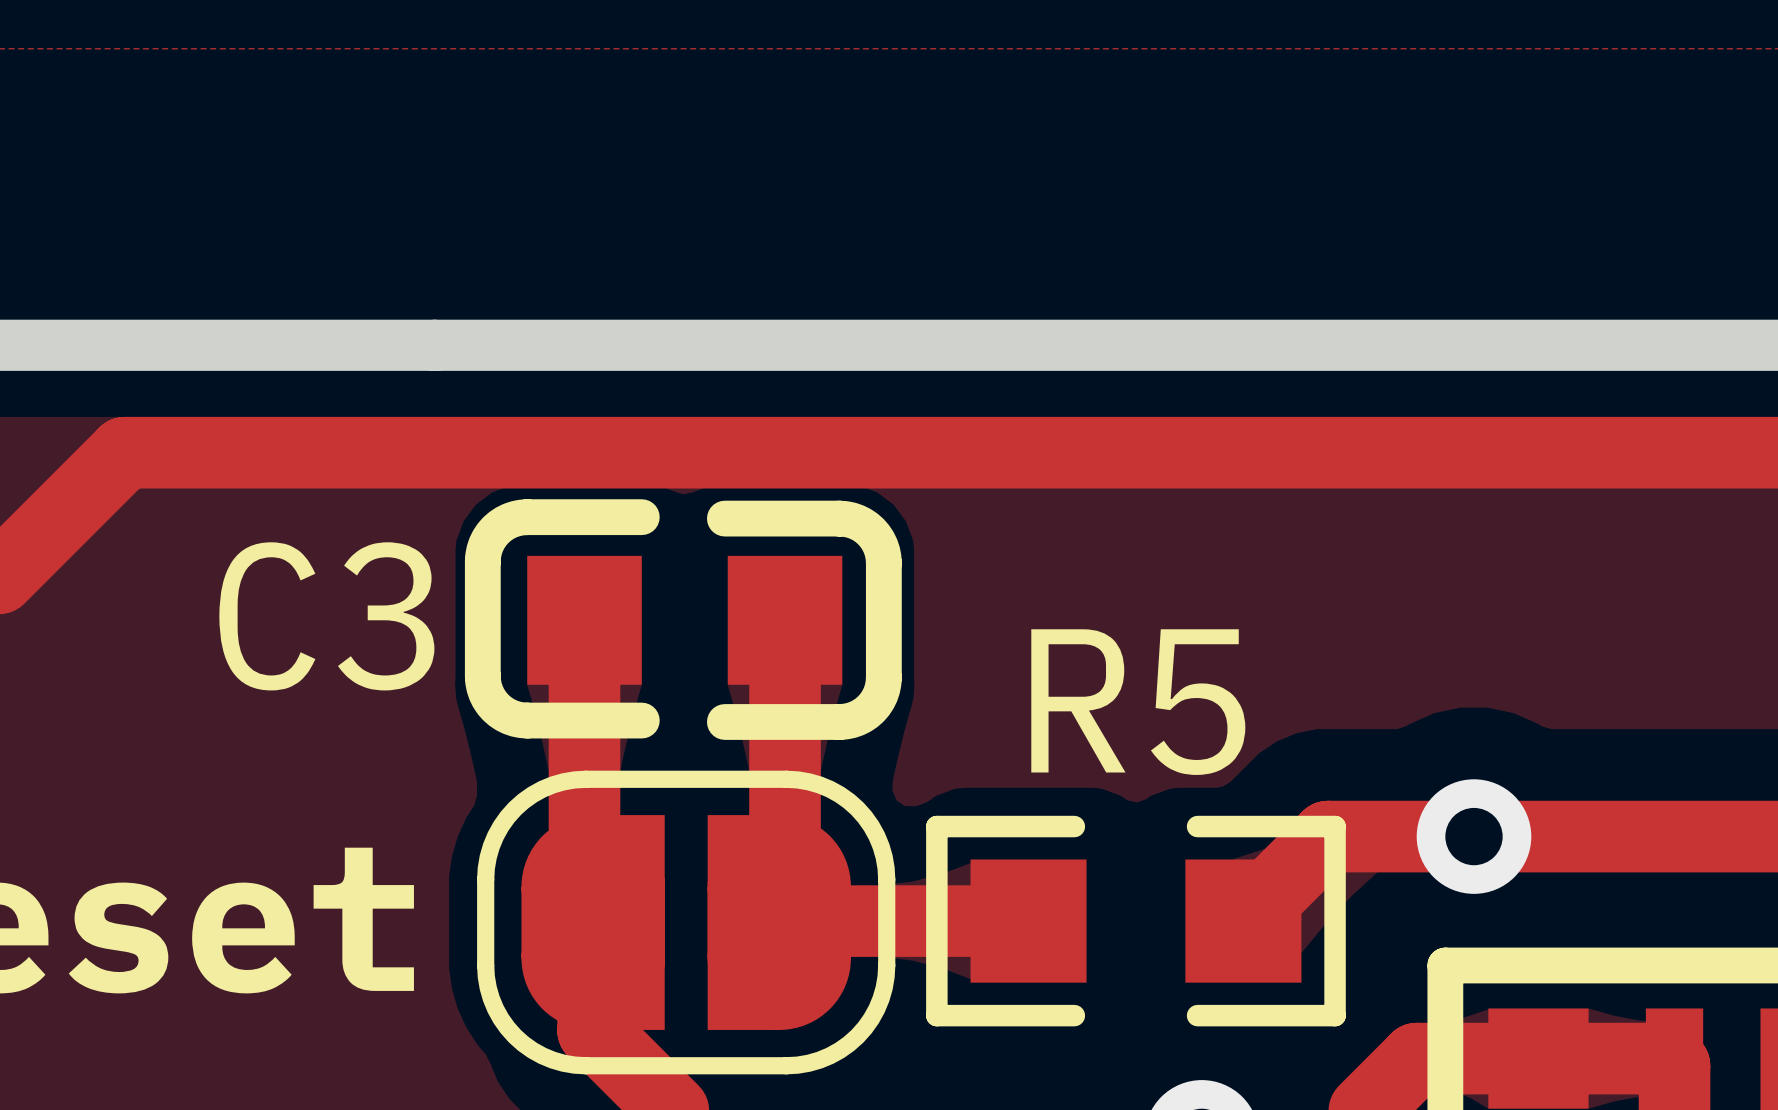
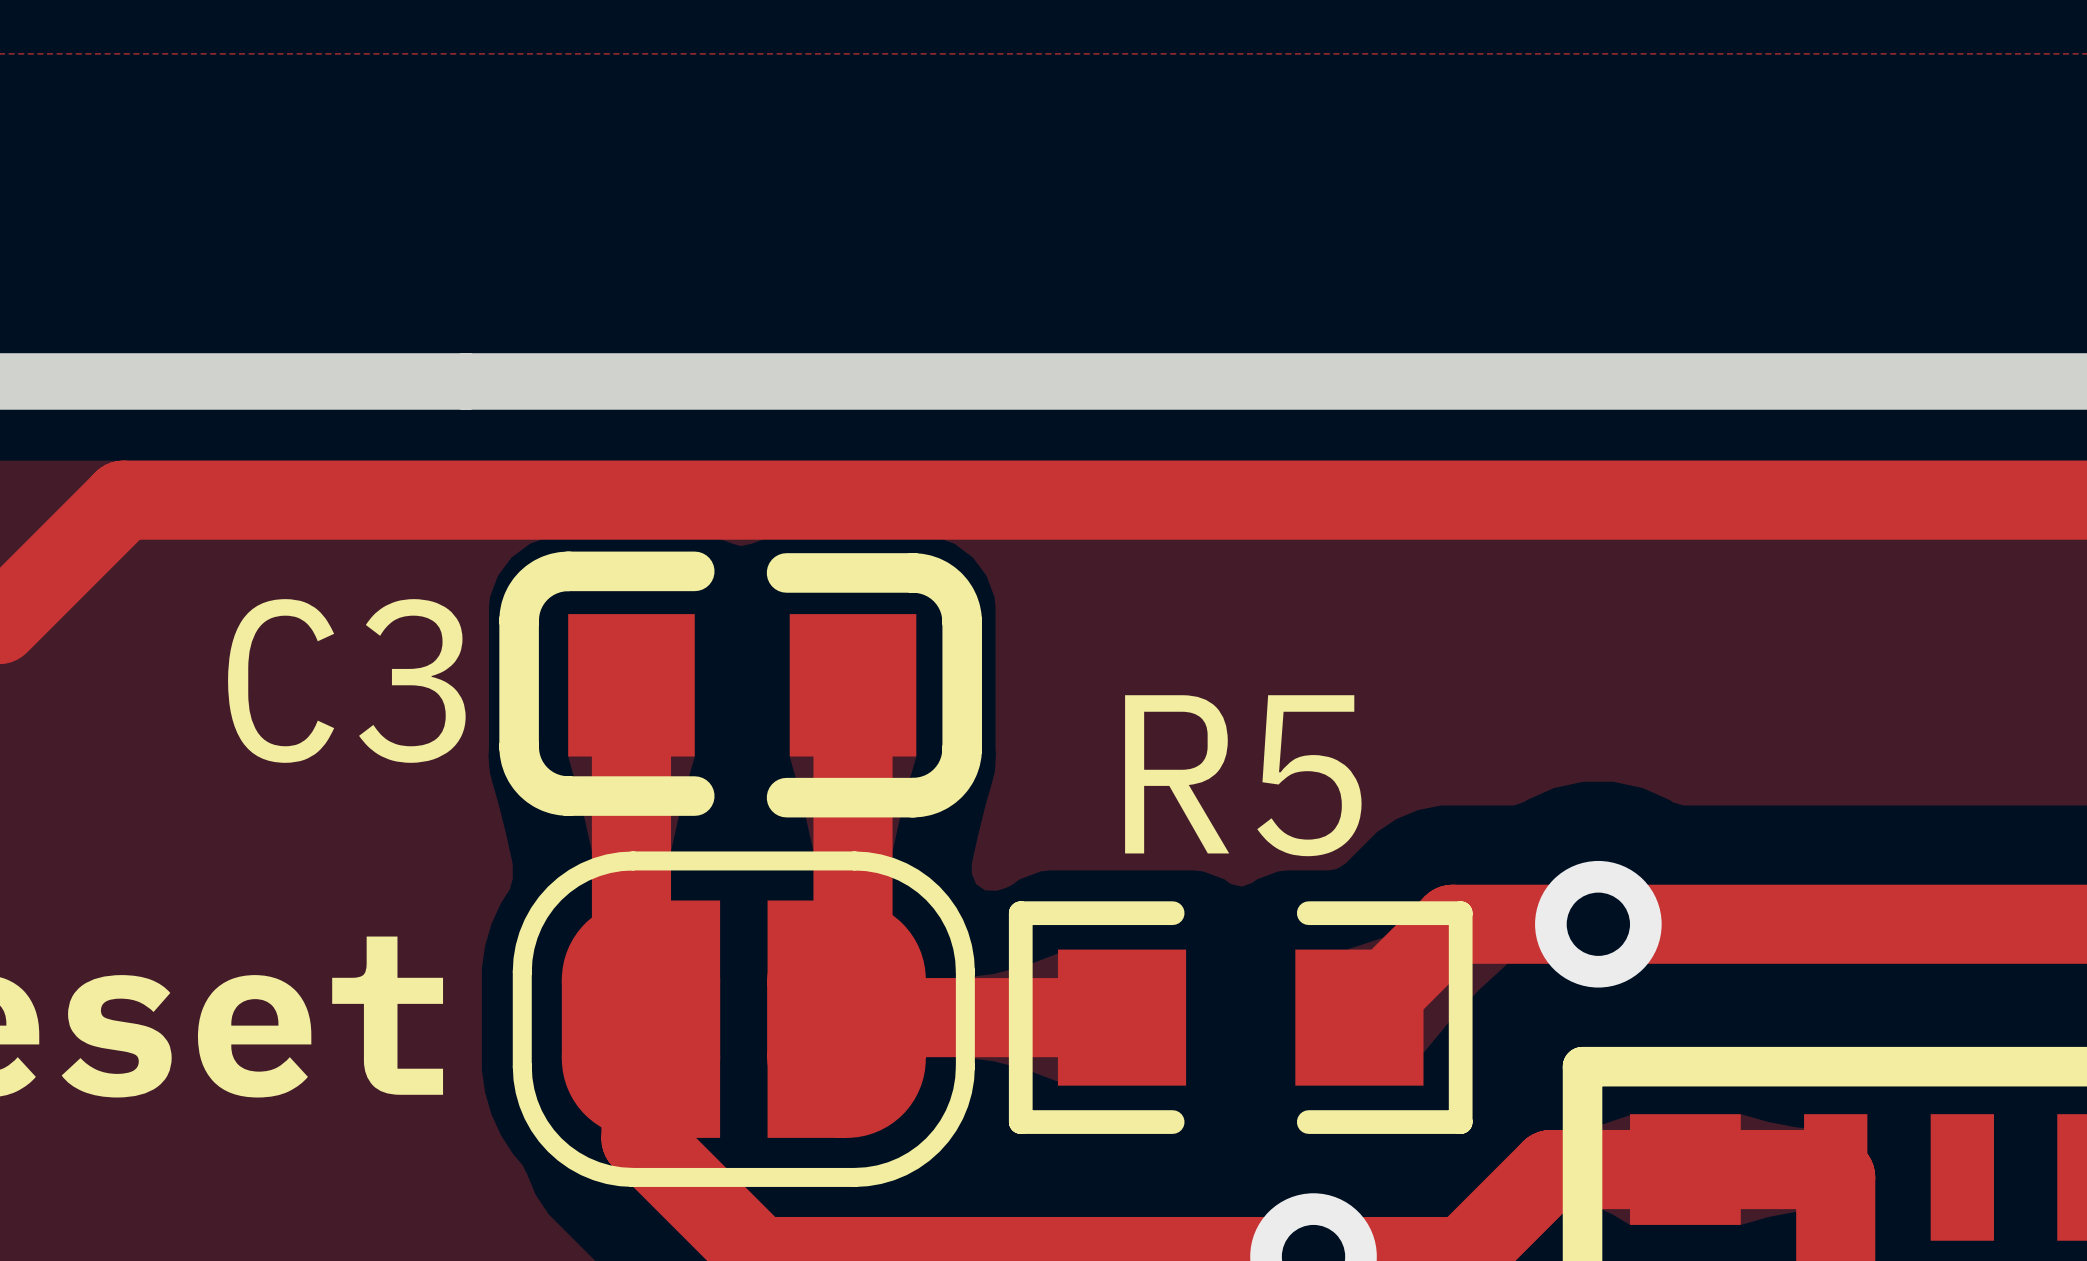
via position: (1474, 836) -> (1598, 924)

